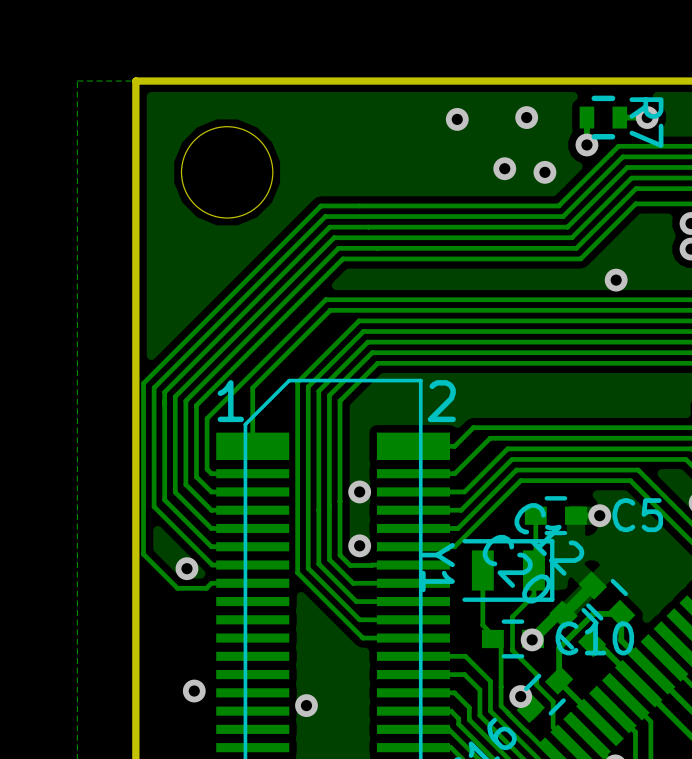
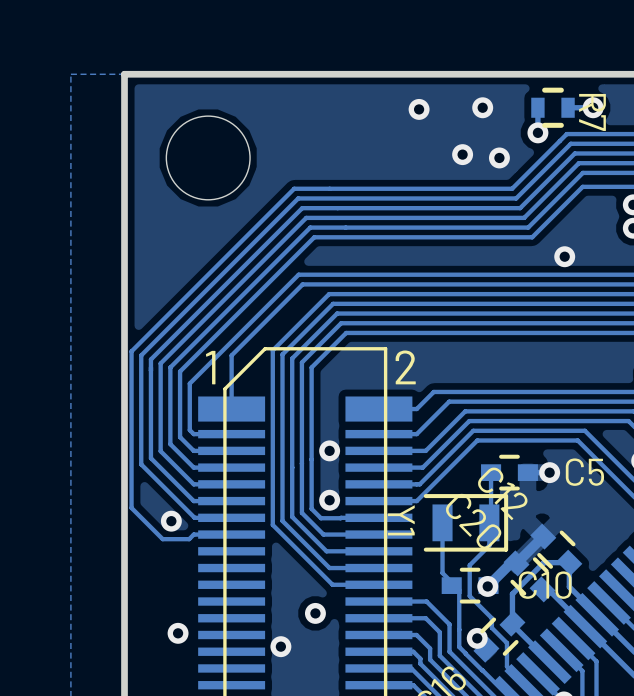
via: none -> (315, 613)

